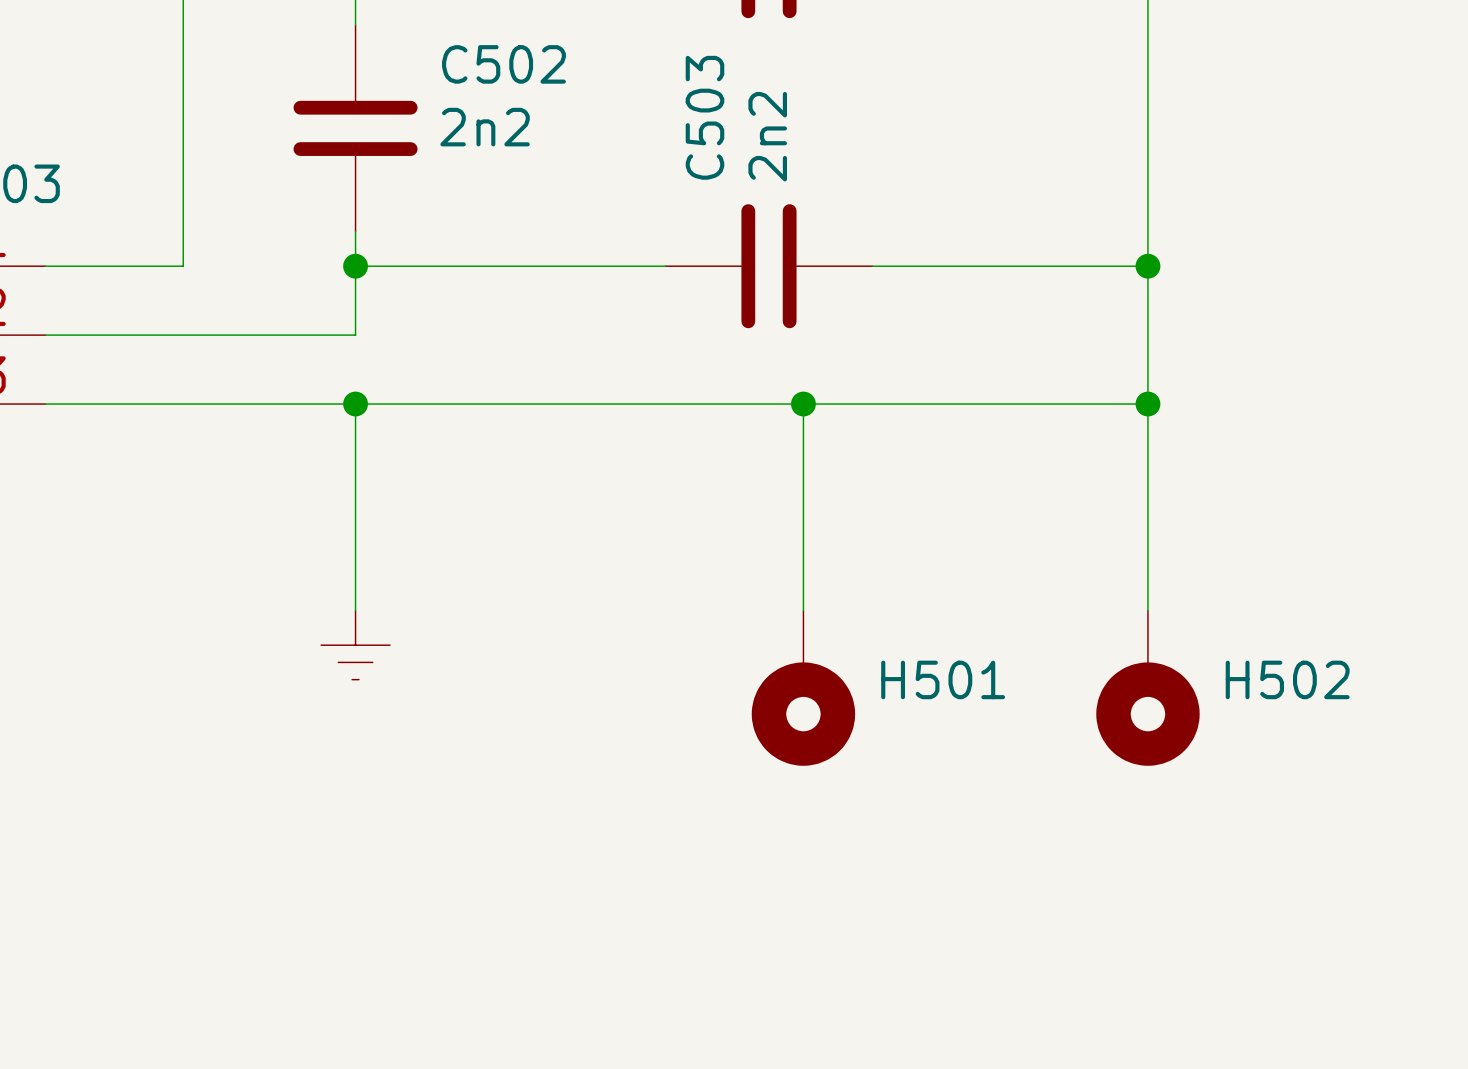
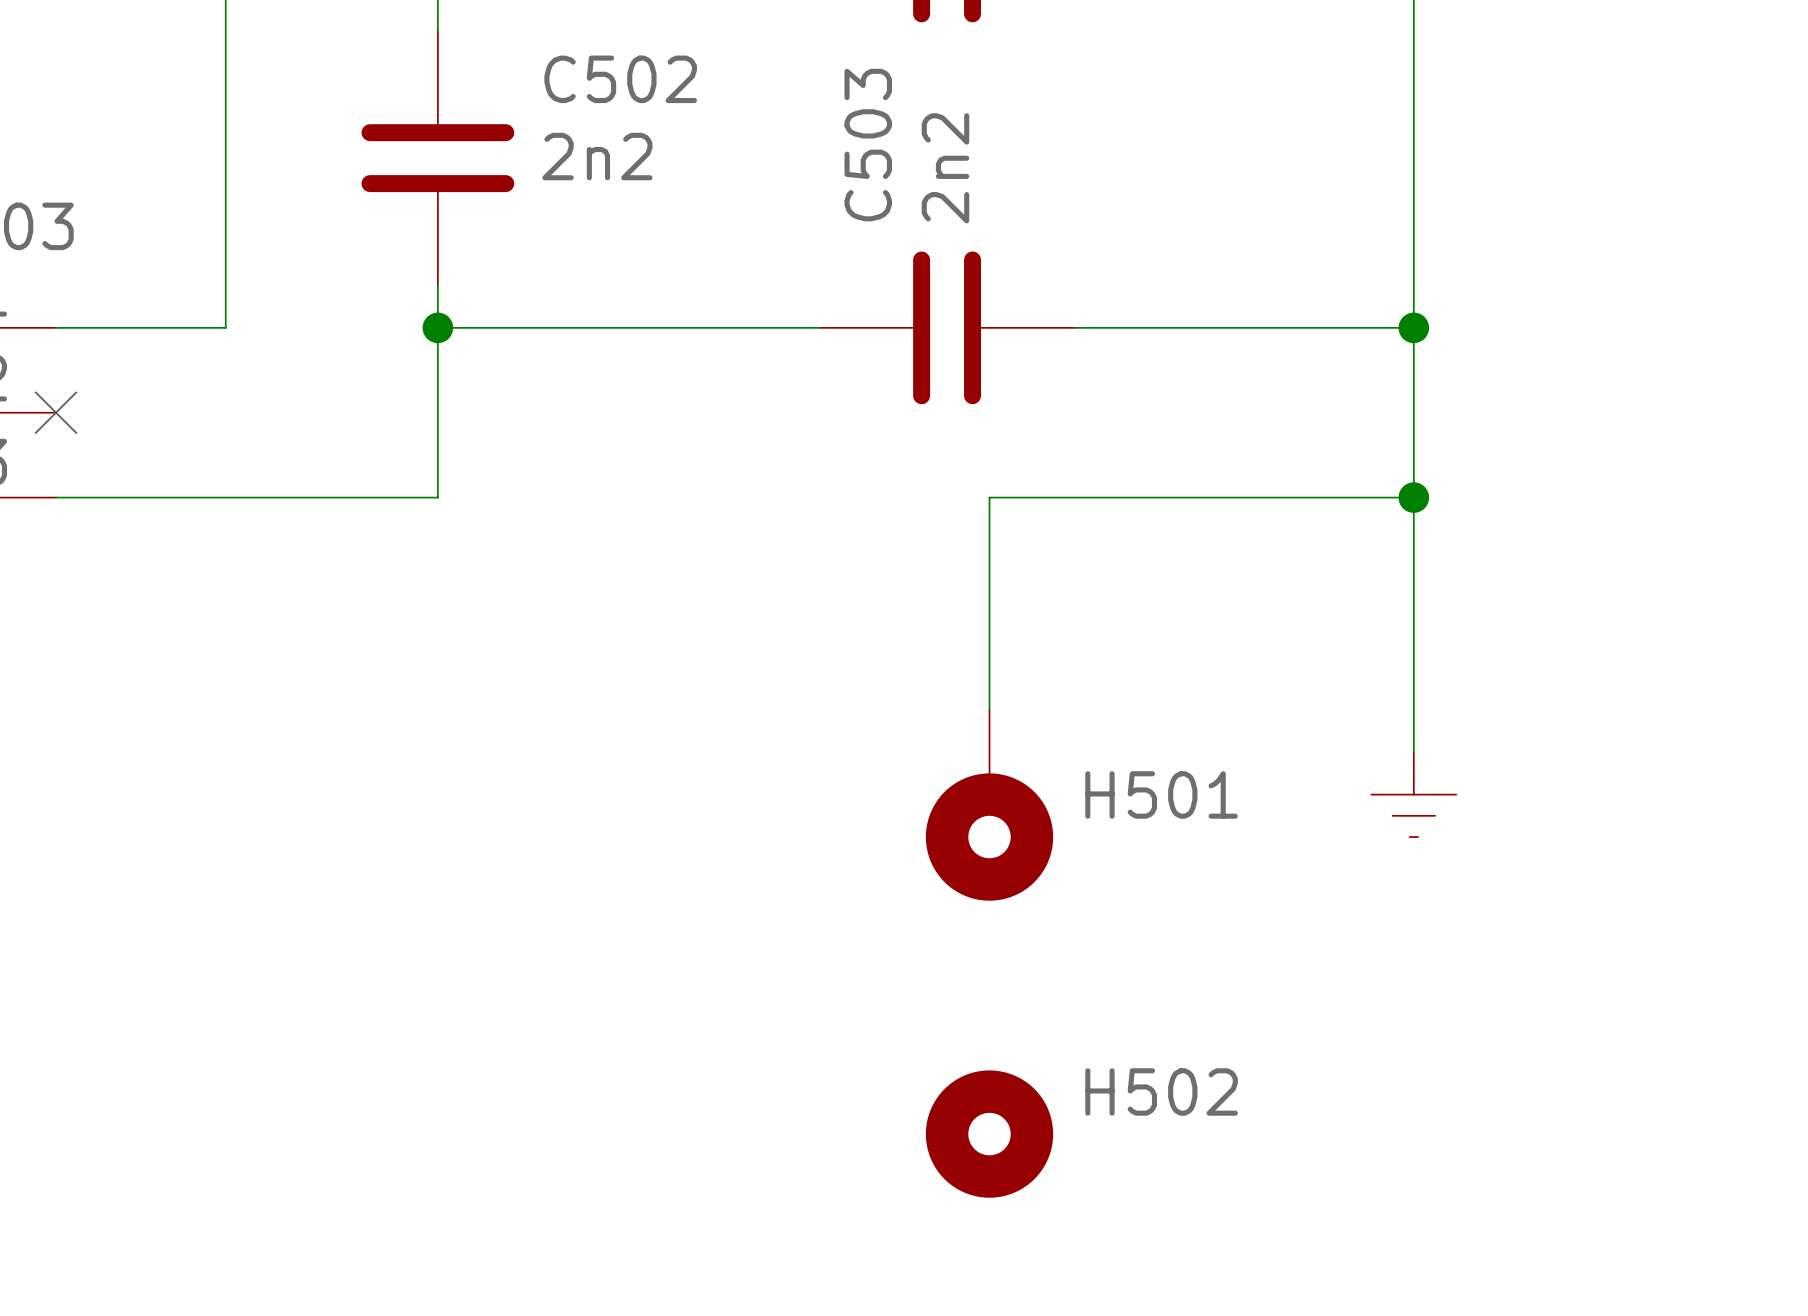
wire: (45, 335) (355, 335) -> (437, 497) (437, 412)
no-connect mark: none -> (56, 412)
junction: (355, 404) -> none
wire: (803, 404) (355, 404) (355, 610) -> none
junction: (803, 404) -> none
H502 symbol: [1096, 610, 1200, 766] -> [925, 1070, 1054, 1198]
power symbol: (355, 645) -> none
power symbol: none -> (1413, 794)
H501 position: (803, 688) -> (989, 805)

